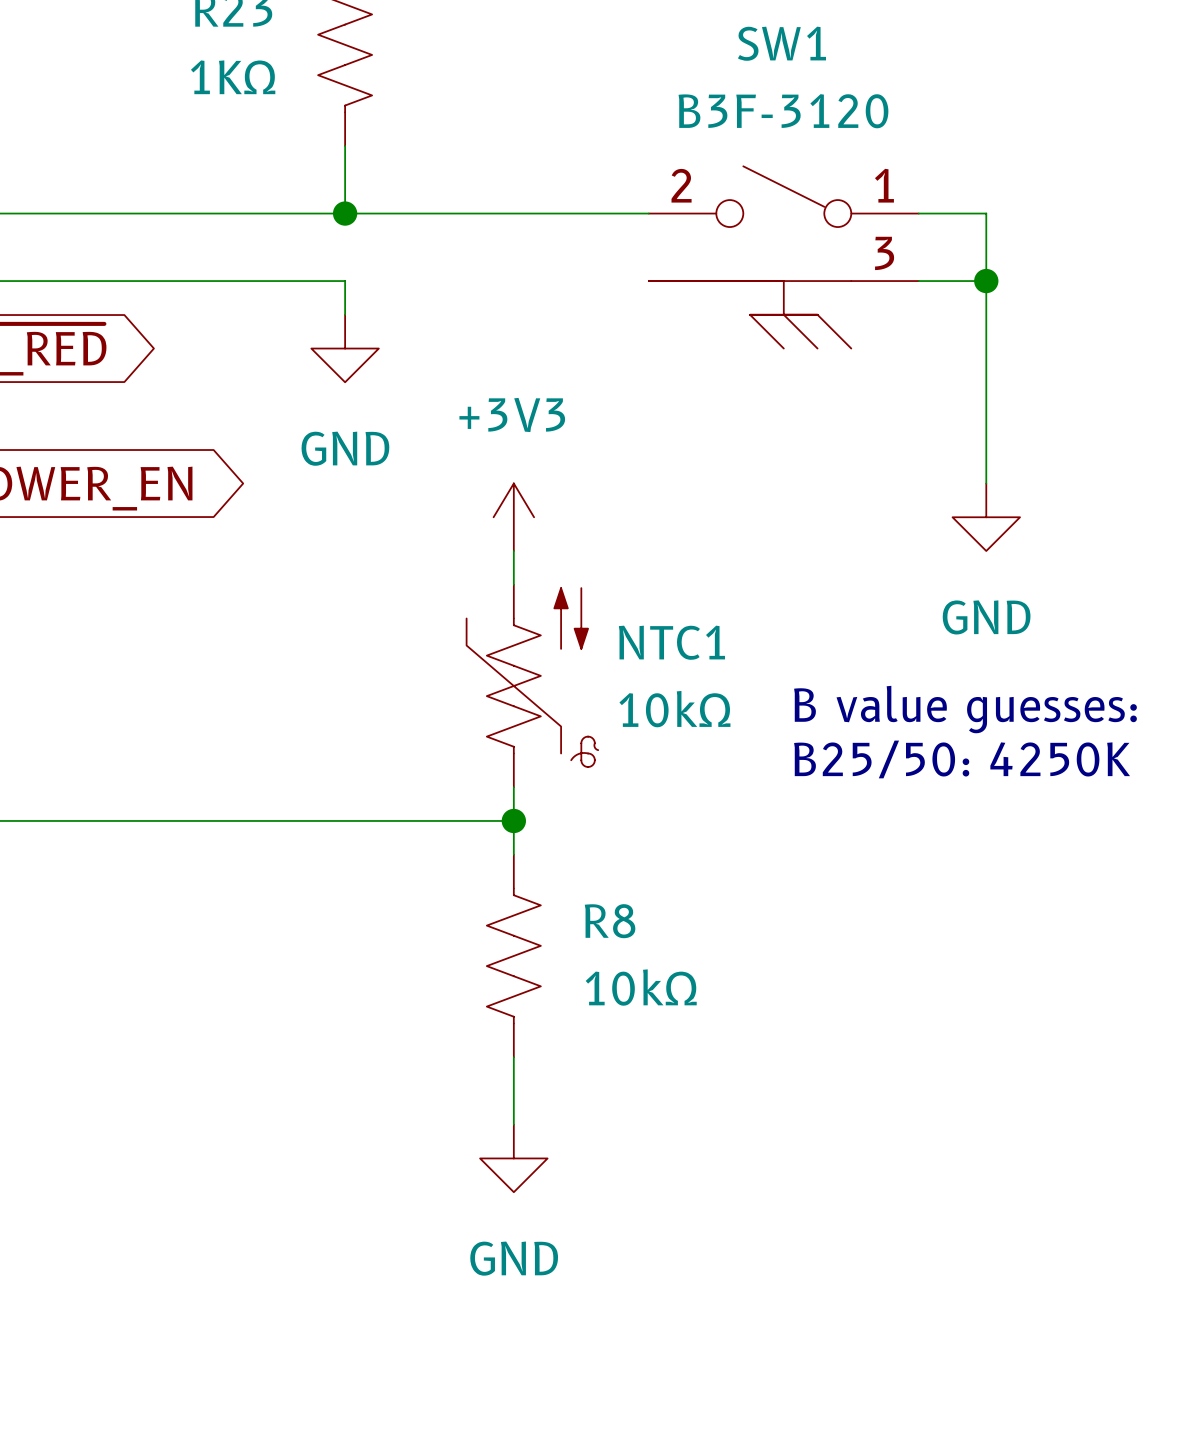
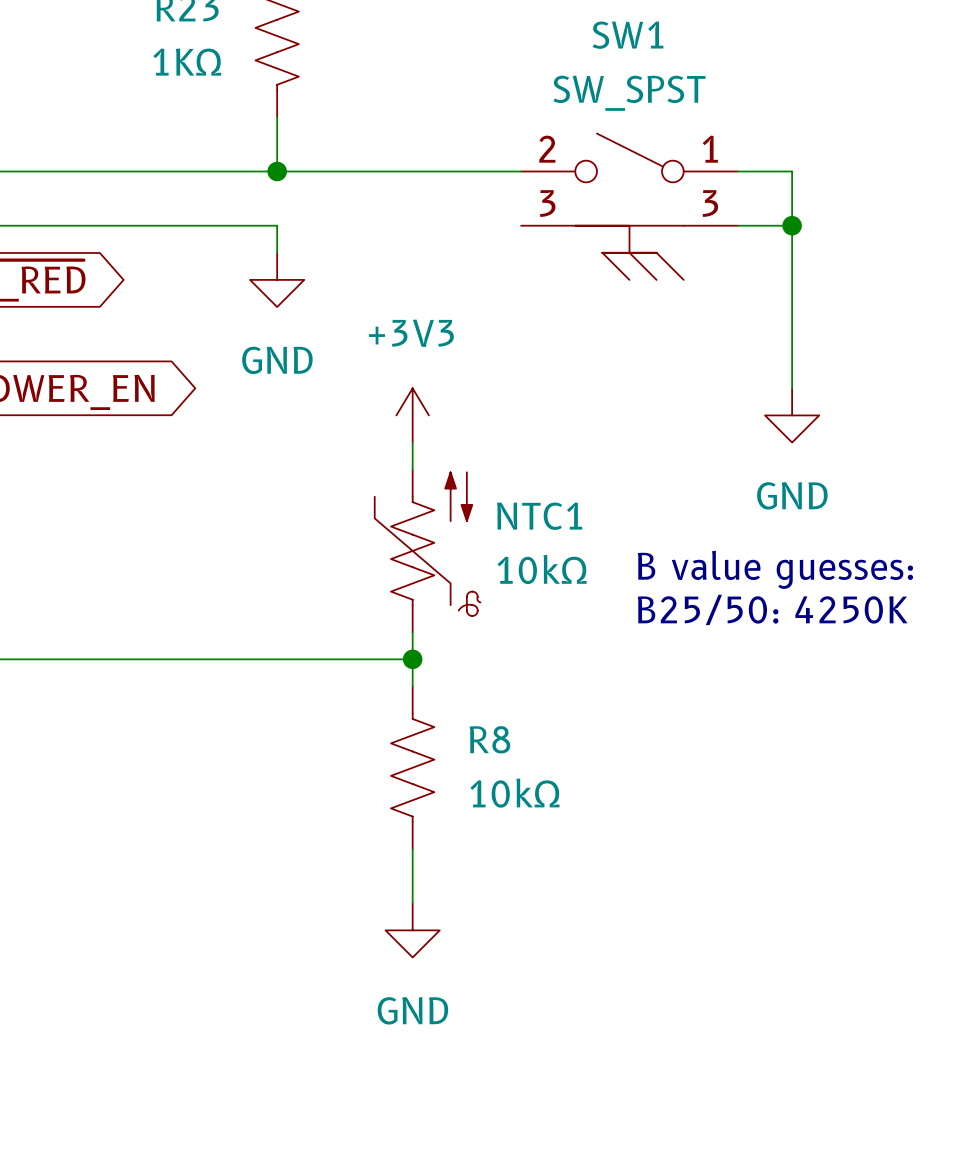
SW1 value: B3F-3120 (783, 111) -> SW_SPST (629, 93)
SW1 symbol: [648, 166, 919, 349] -> [521, 133, 738, 280]

